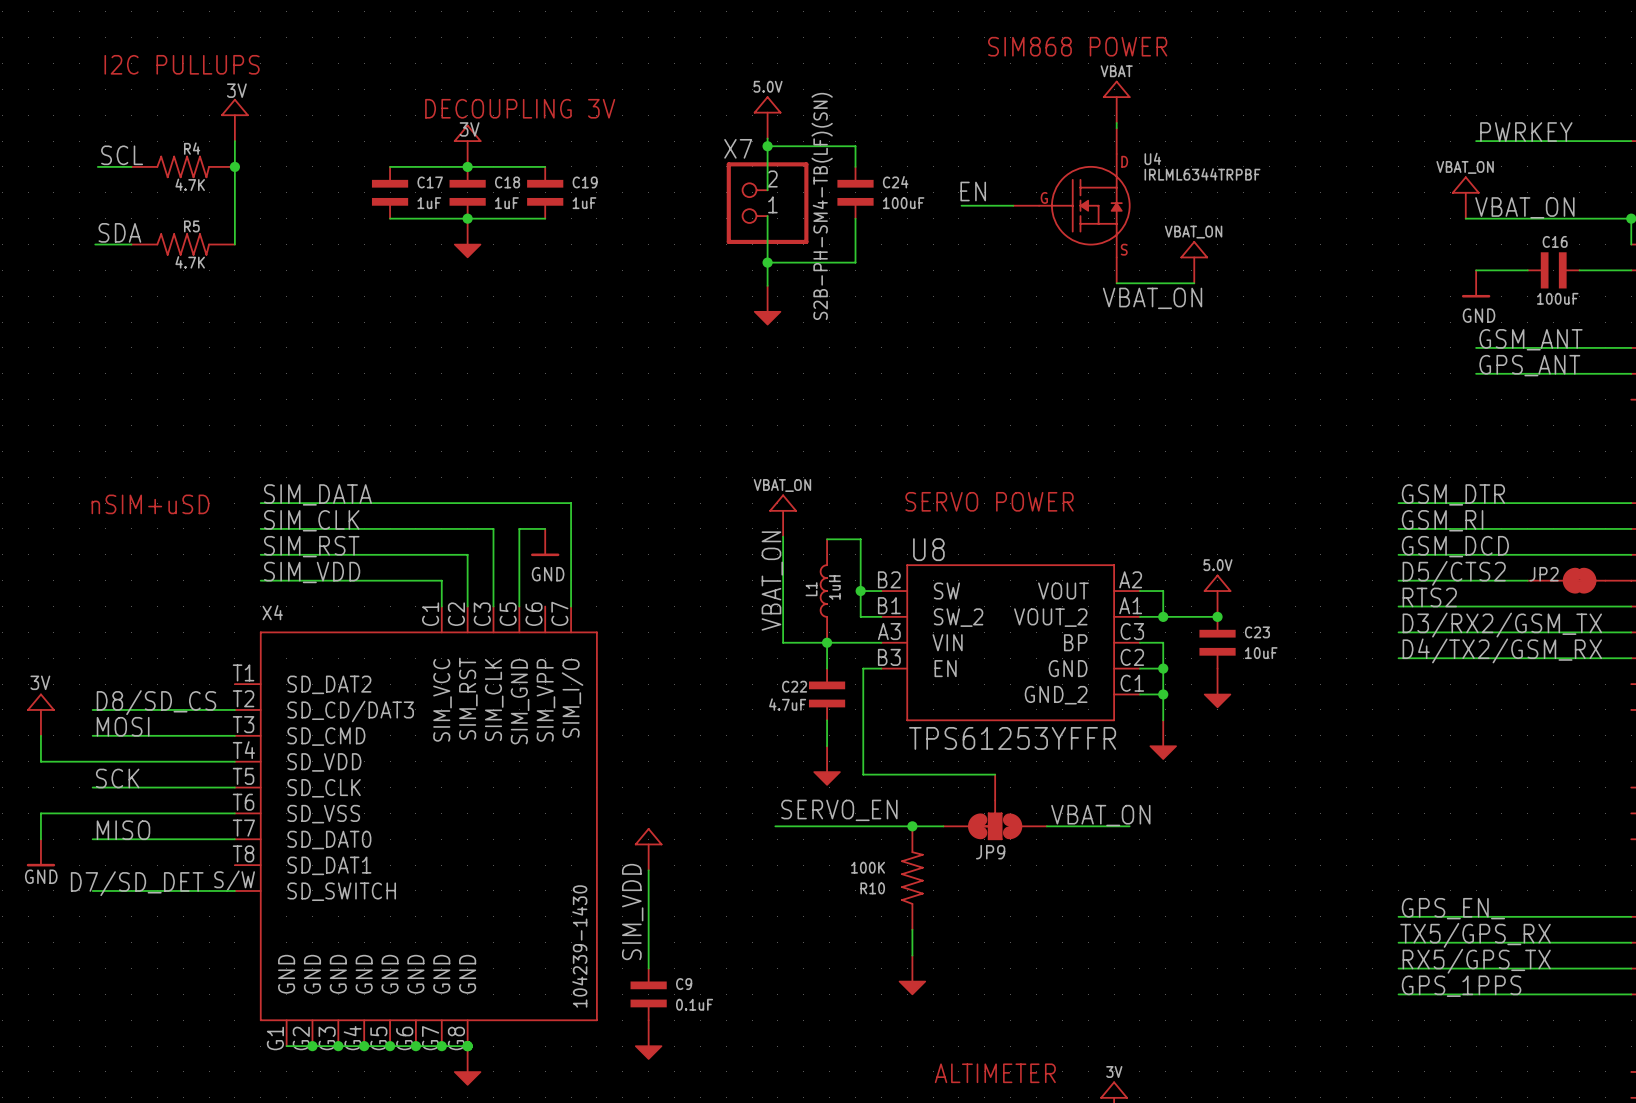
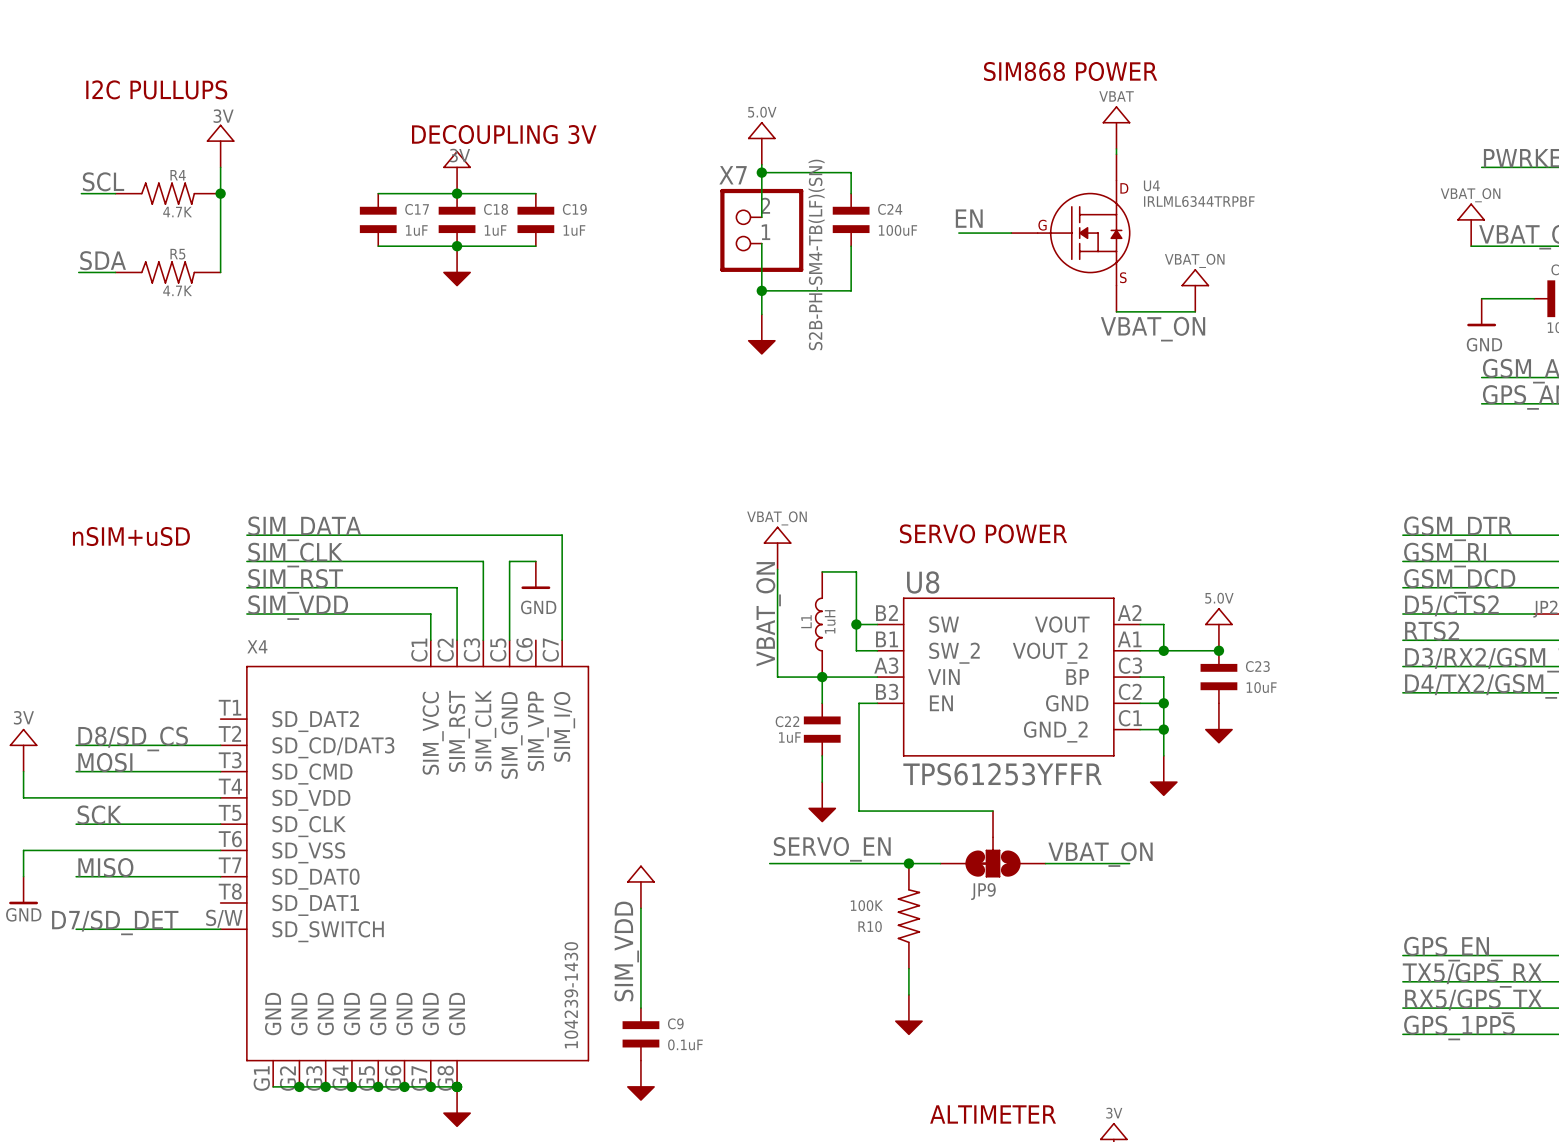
C22 value: 4.7uF (787, 704) -> 1uF (789, 737)

